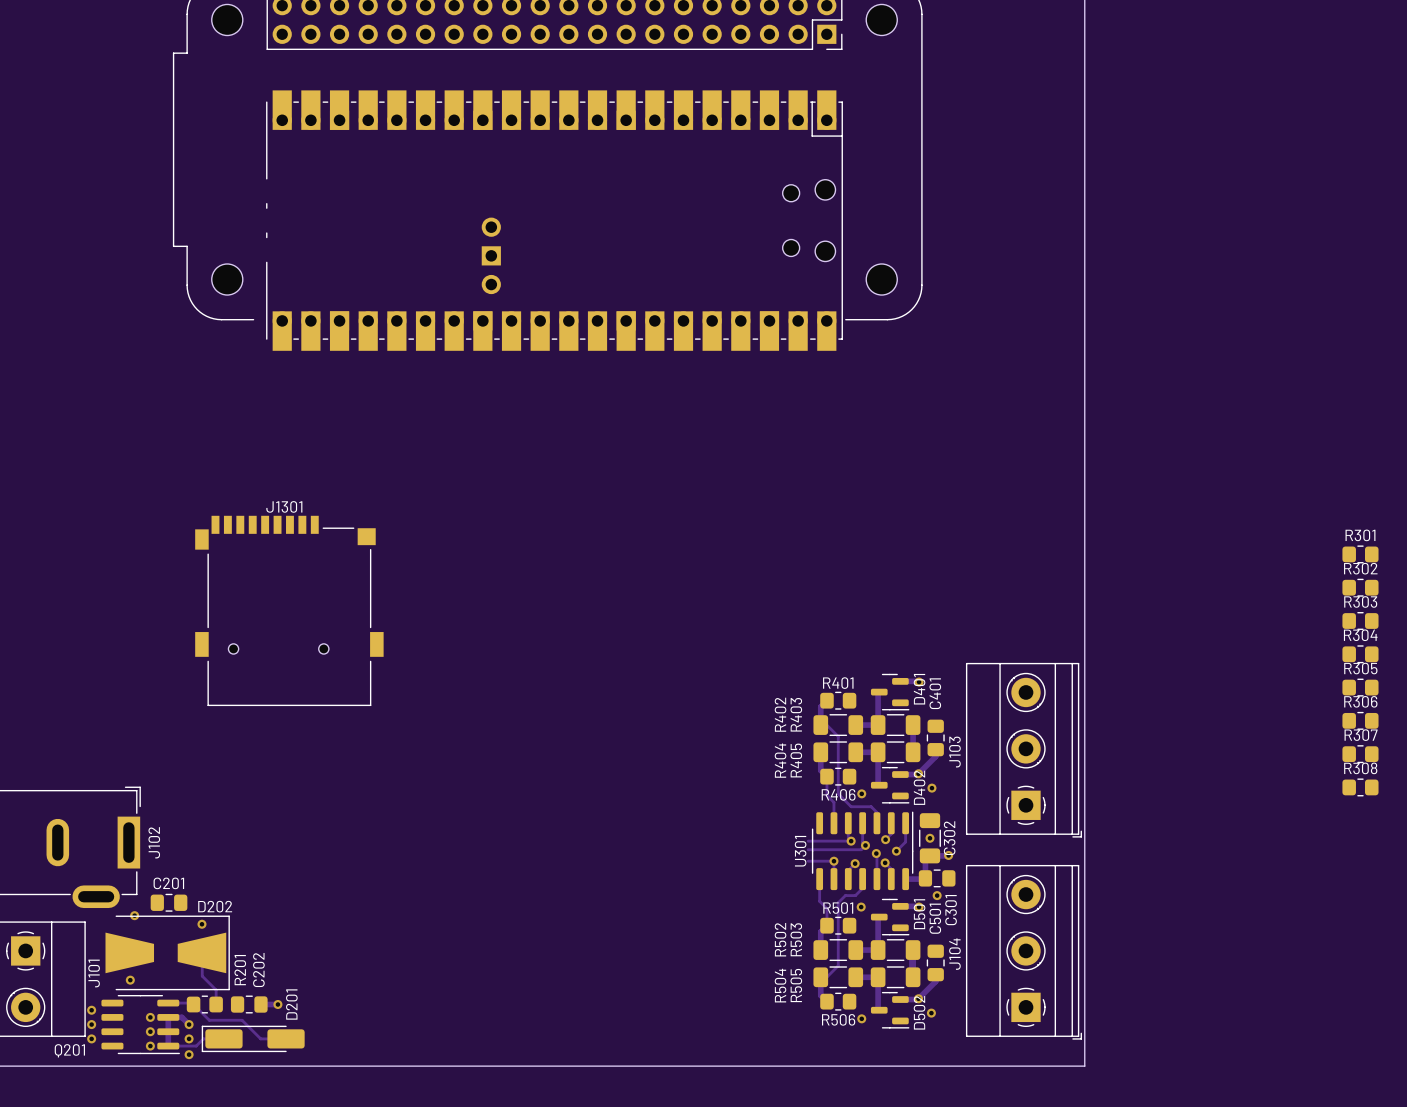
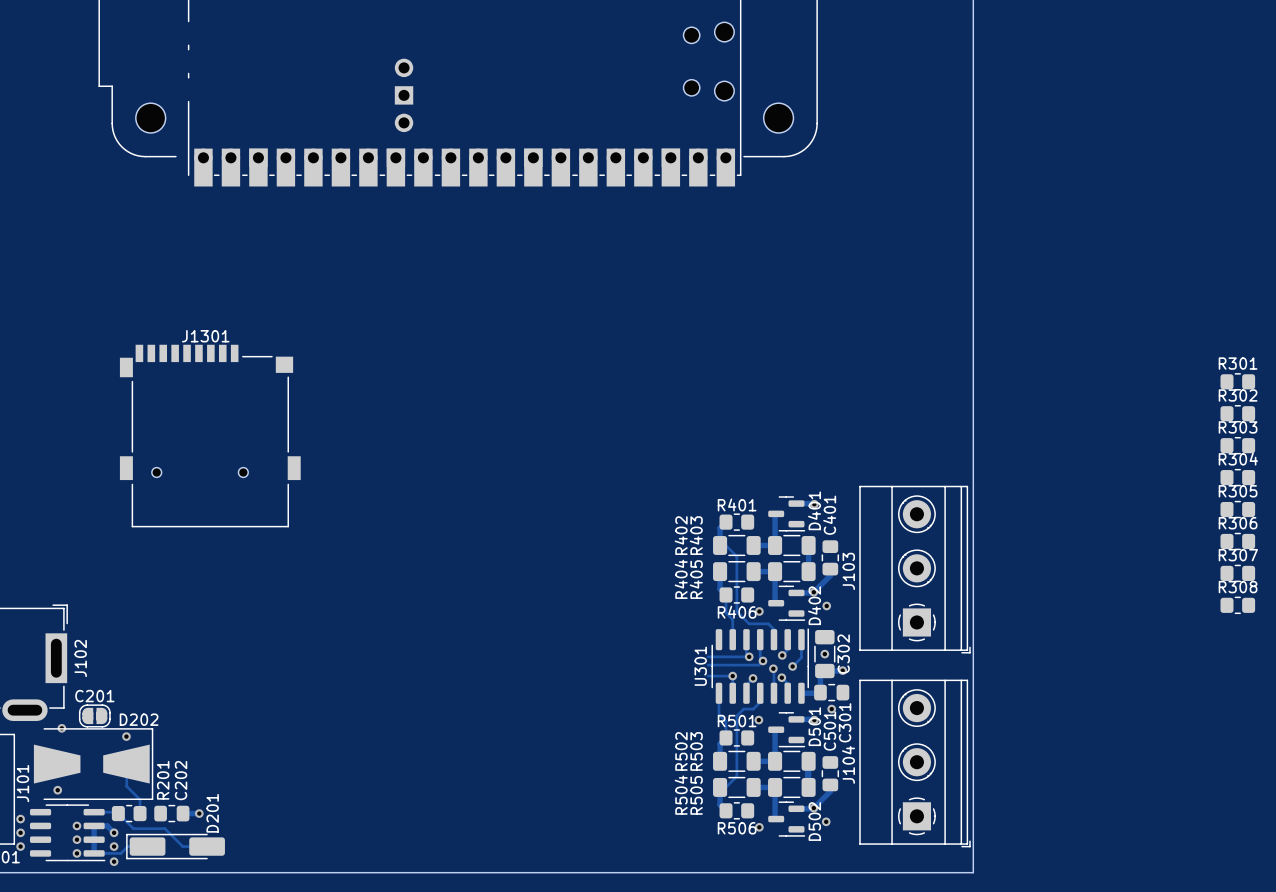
C201 footprint: [150, 893, 188, 912] -> [79, 704, 111, 728]

